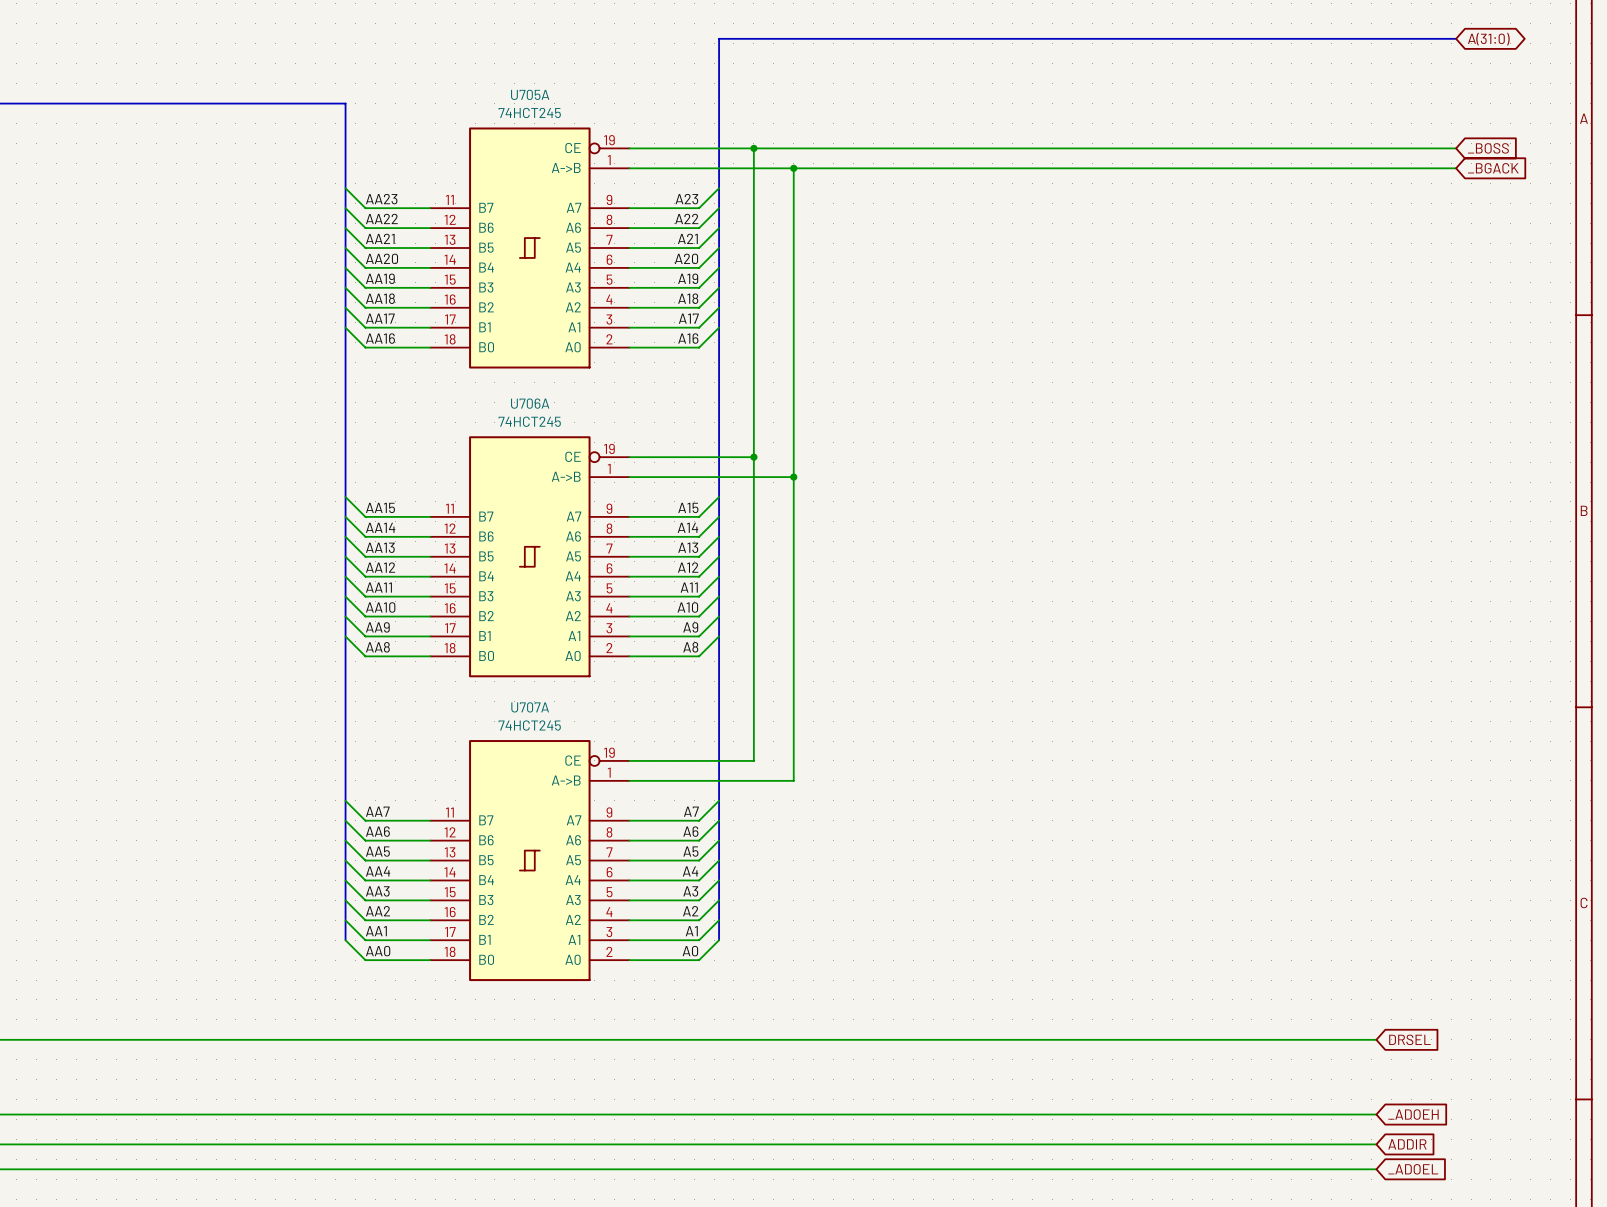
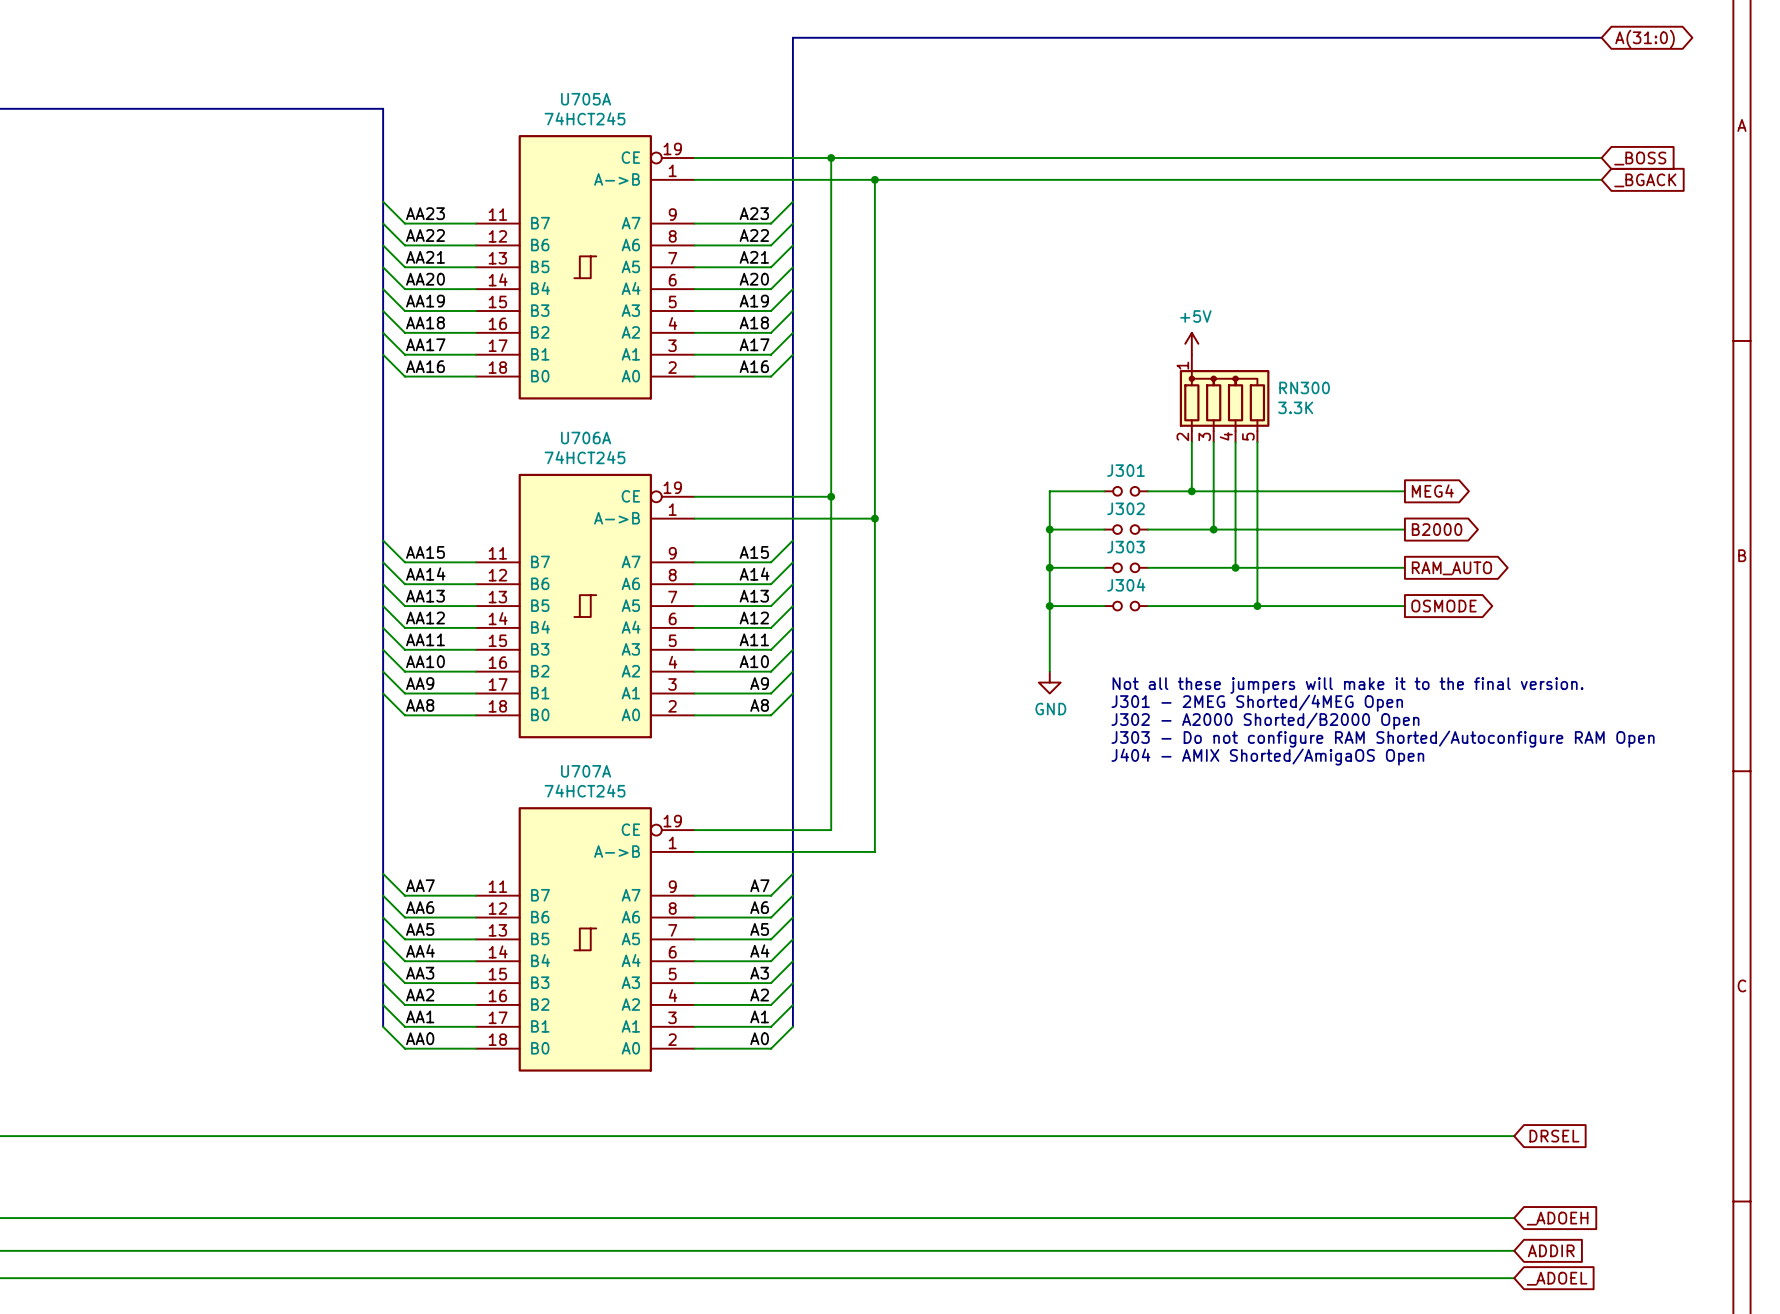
power symbol: none -> +5V (1191, 343)
RN300: none -> 3.3K (1224, 398)
wire: none -> (1191, 442) (1191, 491)
wire: none -> (1213, 442) (1213, 529)
wire: none -> (1235, 442) (1235, 567)
wire: none -> (1257, 442) (1257, 606)
wire: none -> (1104, 491) (1049, 491) (1049, 671)
J301: none -> (1126, 491)
wire: none -> (1148, 491) (1404, 491)
junction: none -> (1191, 491)
global label: none -> MEG4 (1432, 491)
wire: none -> (1049, 529) (1104, 529)
junction: none -> (1049, 529)
J302: none -> (1126, 529)
wire: none -> (1148, 529) (1404, 529)
junction: none -> (1213, 529)
global label: none -> B2000 (1437, 529)
wire: none -> (1049, 567) (1104, 567)
junction: none -> (1049, 567)
J303: none -> (1126, 567)
wire: none -> (1148, 567) (1404, 567)
junction: none -> (1235, 567)
global label: none -> RAM_AUTO (1451, 568)
wire: none -> (1049, 606) (1104, 606)
junction: none -> (1049, 606)
J304: none -> (1126, 606)
wire: none -> (1148, 606) (1404, 606)
junction: none -> (1257, 606)
global label: none -> OSMODE (1443, 606)
power symbol: none -> GND (1049, 682)
text: none -> Not all these jumpers will make it to the final version. (1348, 685)
text: none -> J301 - 2MEG Shorted/4MEG Open (1257, 703)
text: none -> J302 - A2000 Shorted/B2000 Open (1265, 721)
text: none -> J303 - Do not configure RAM Shorted/Autoconfigure RAM Open (1383, 739)
text: none -> J404 - AMIX Shorted/AmigaOS Open (1267, 757)

